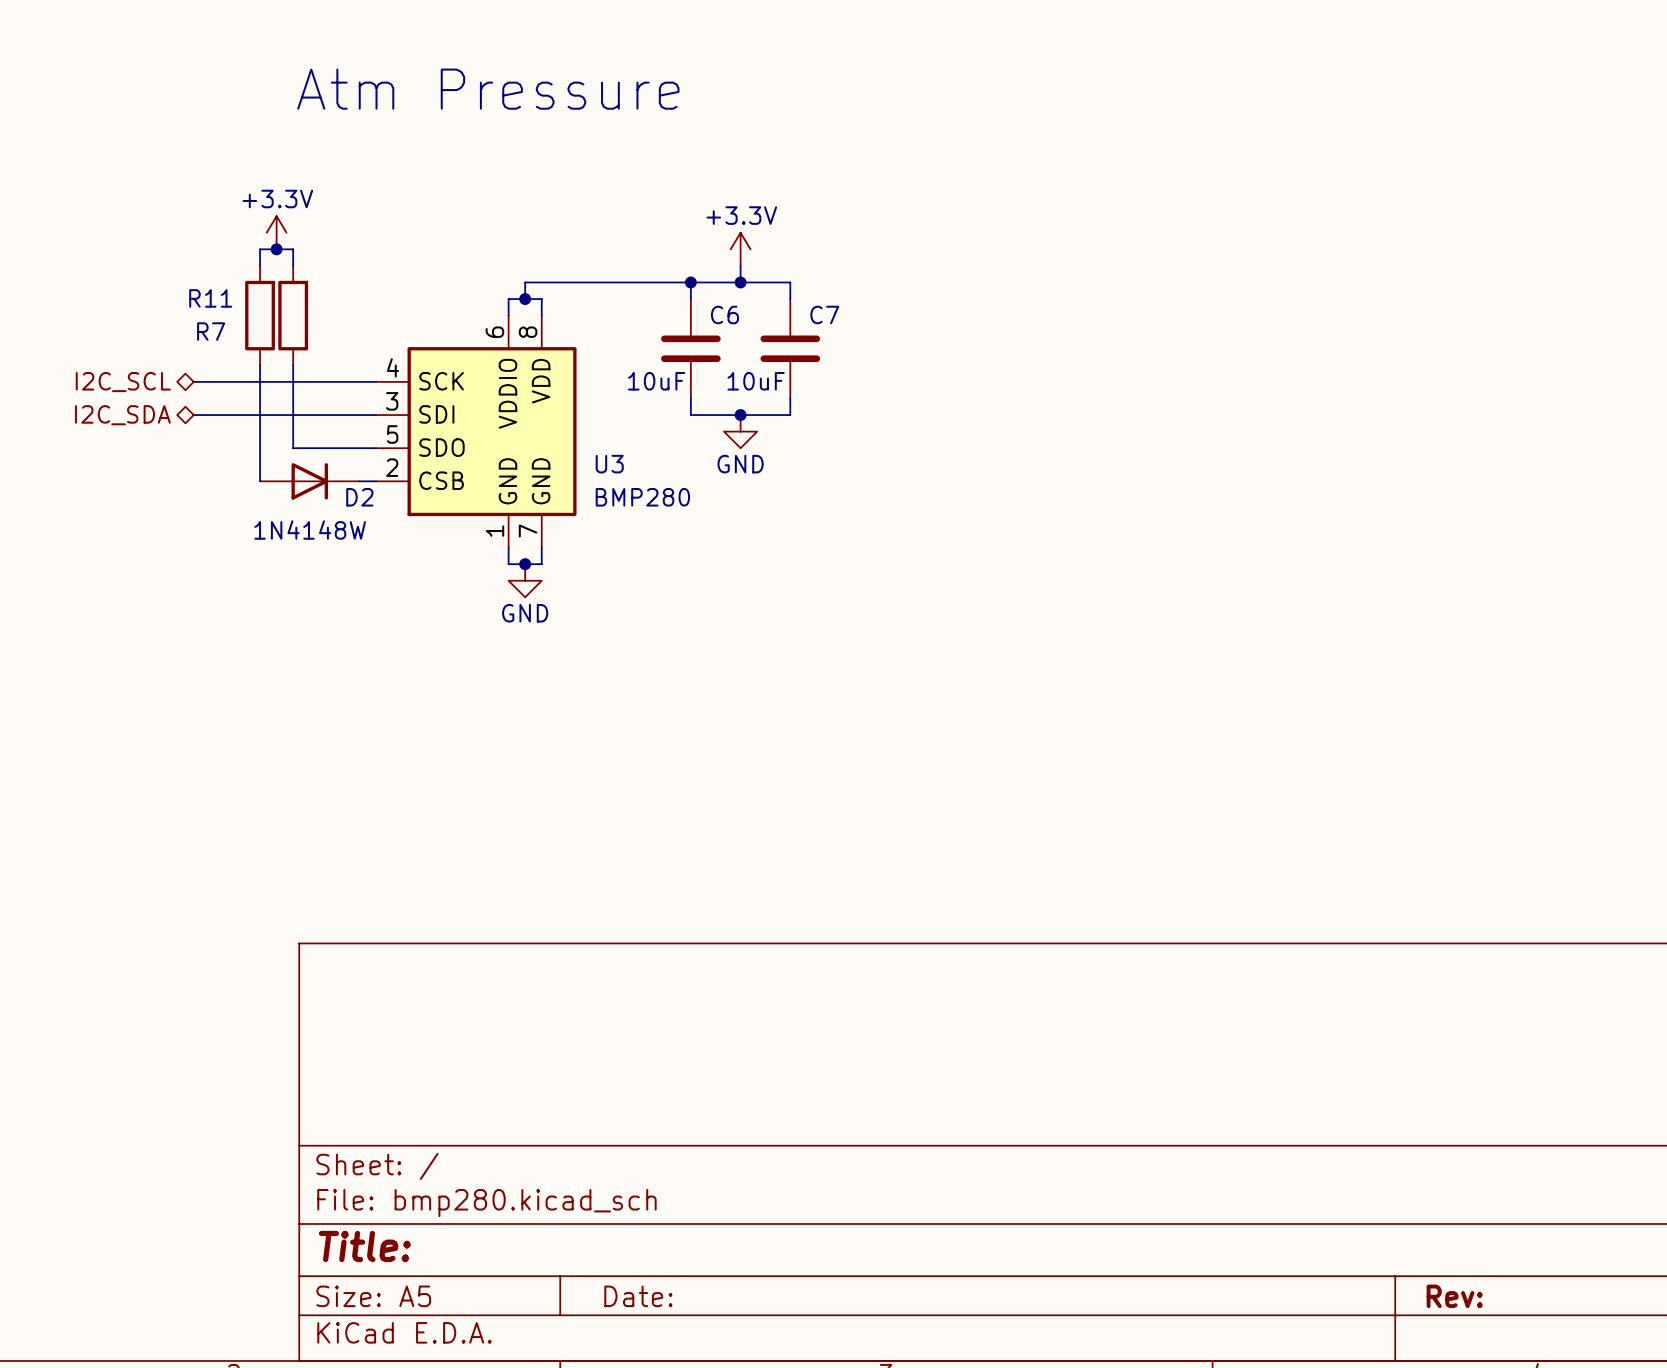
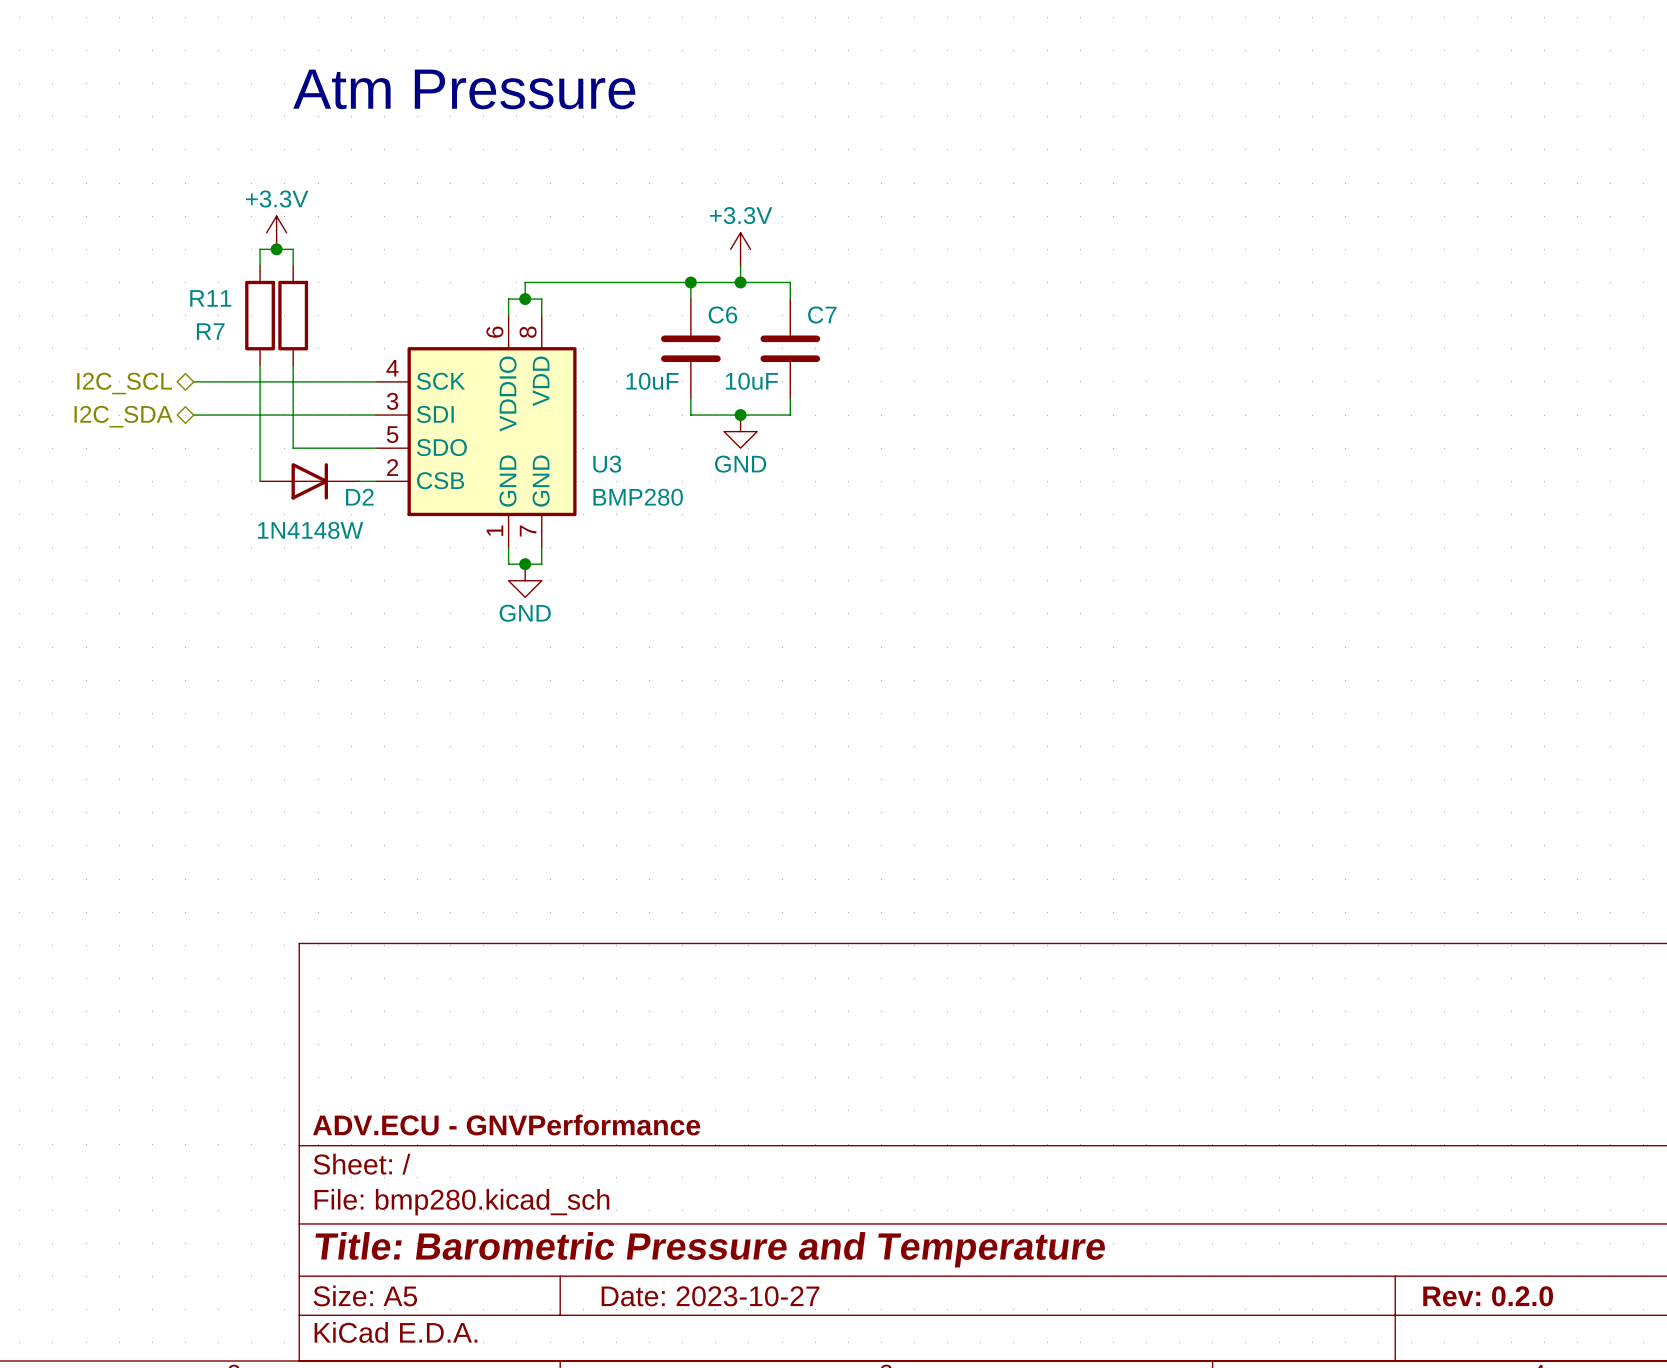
title block: none -> ADV.ECU - GNVPerformance (506, 1125)
title block: Title: (364, 1246) -> Title: Barometric Pressure and Temperature (710, 1249)
title block: Date: (638, 1296) -> Date: 2023-10-27 (710, 1296)
title block: Rev: (1454, 1296) -> Rev: 0.2.0 (1488, 1296)

